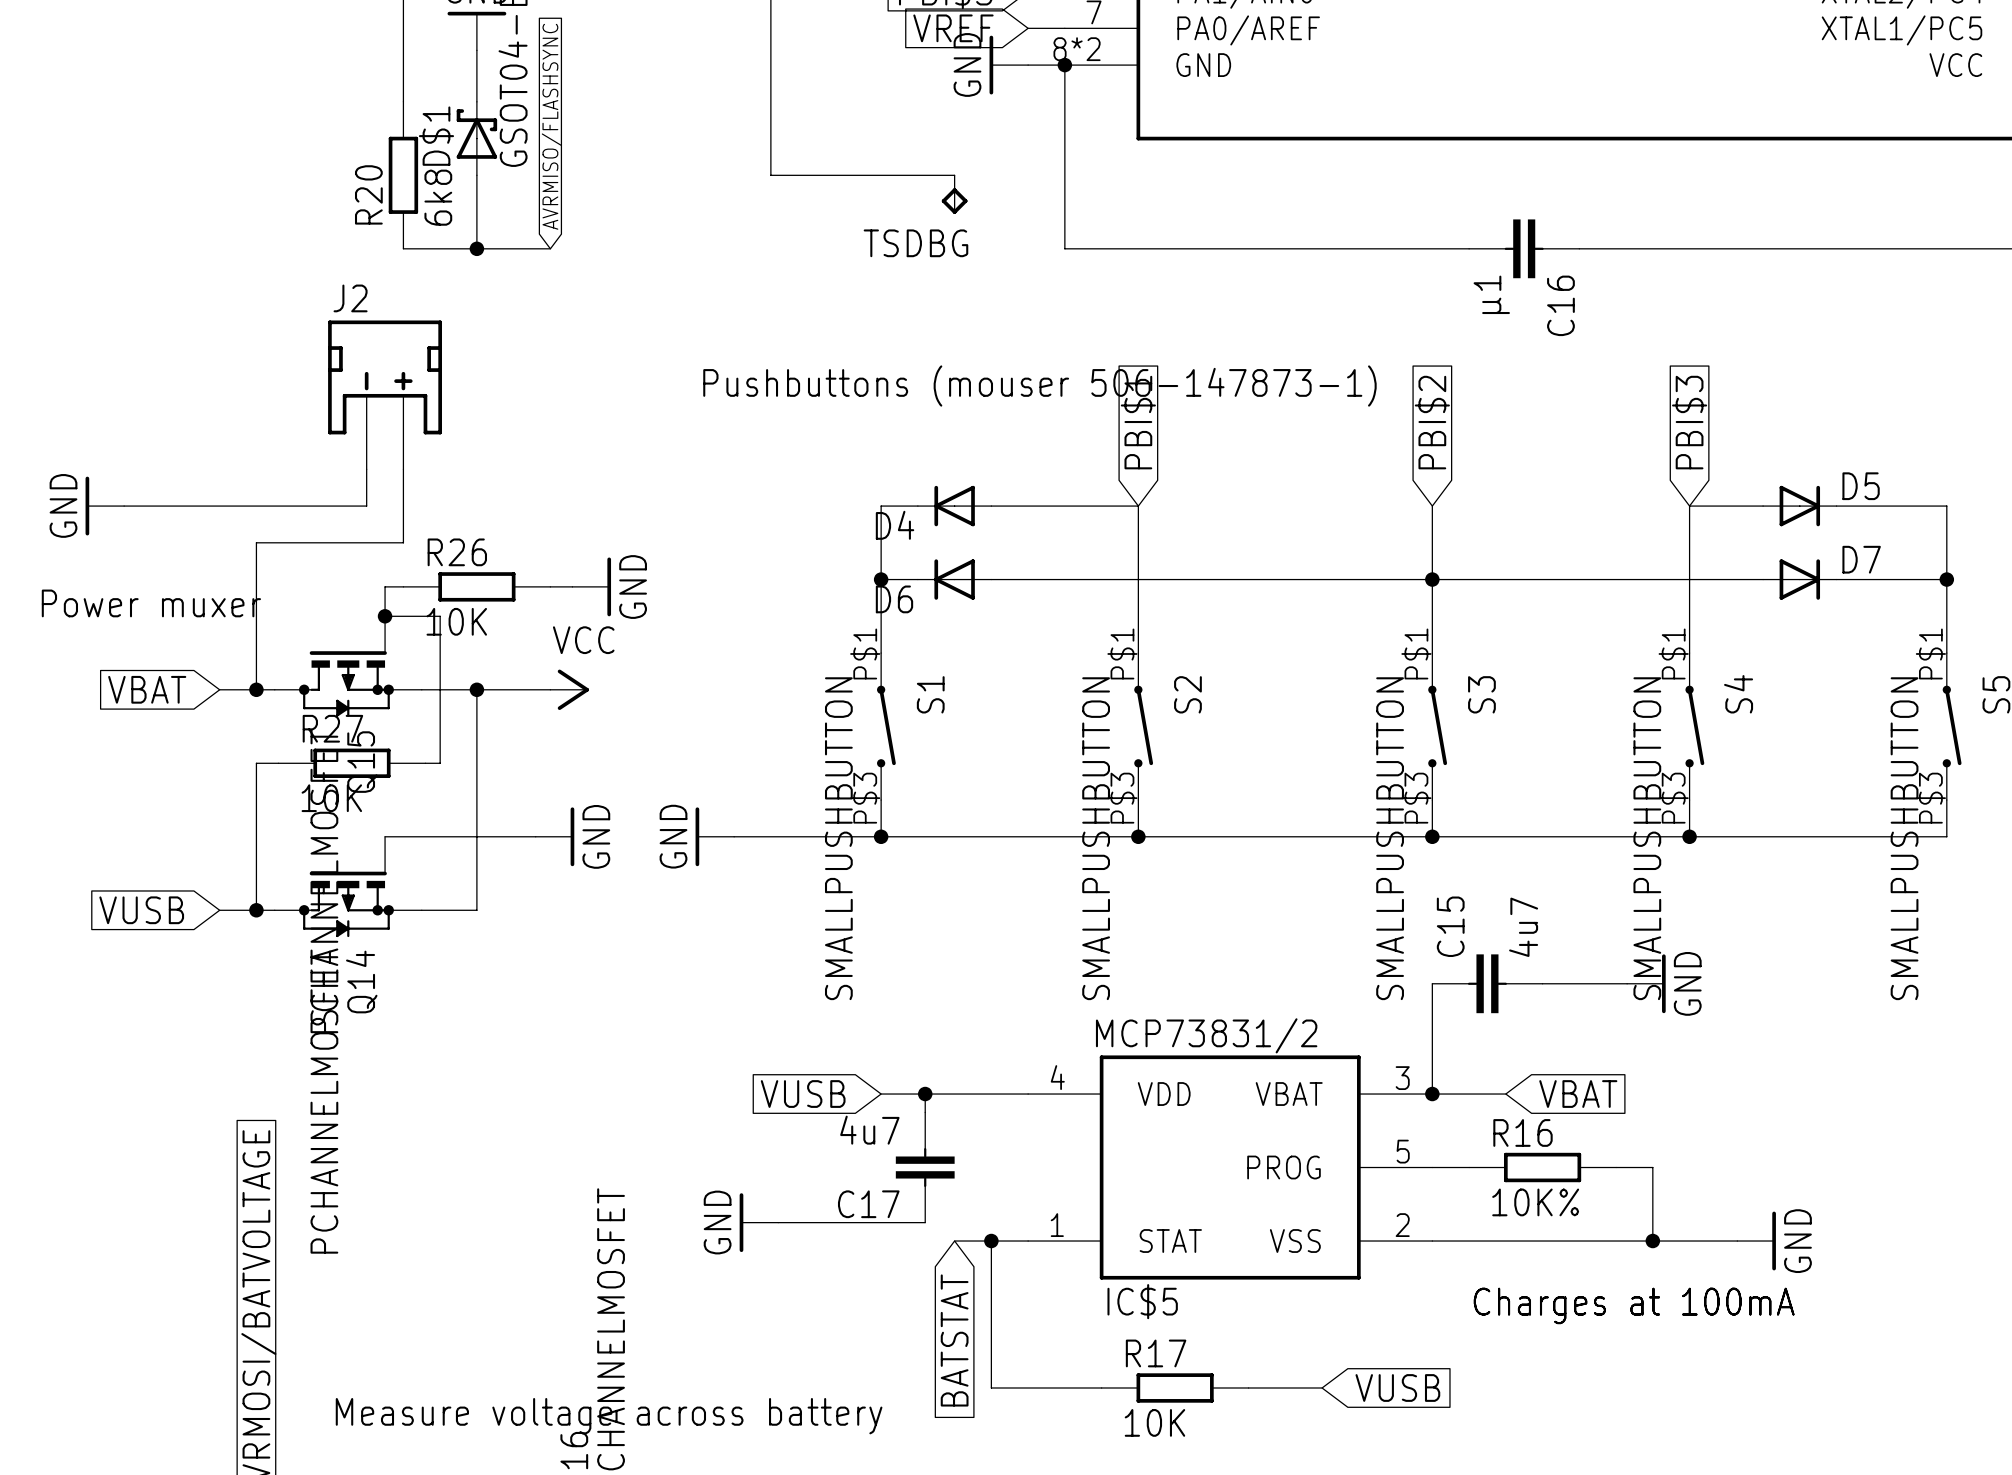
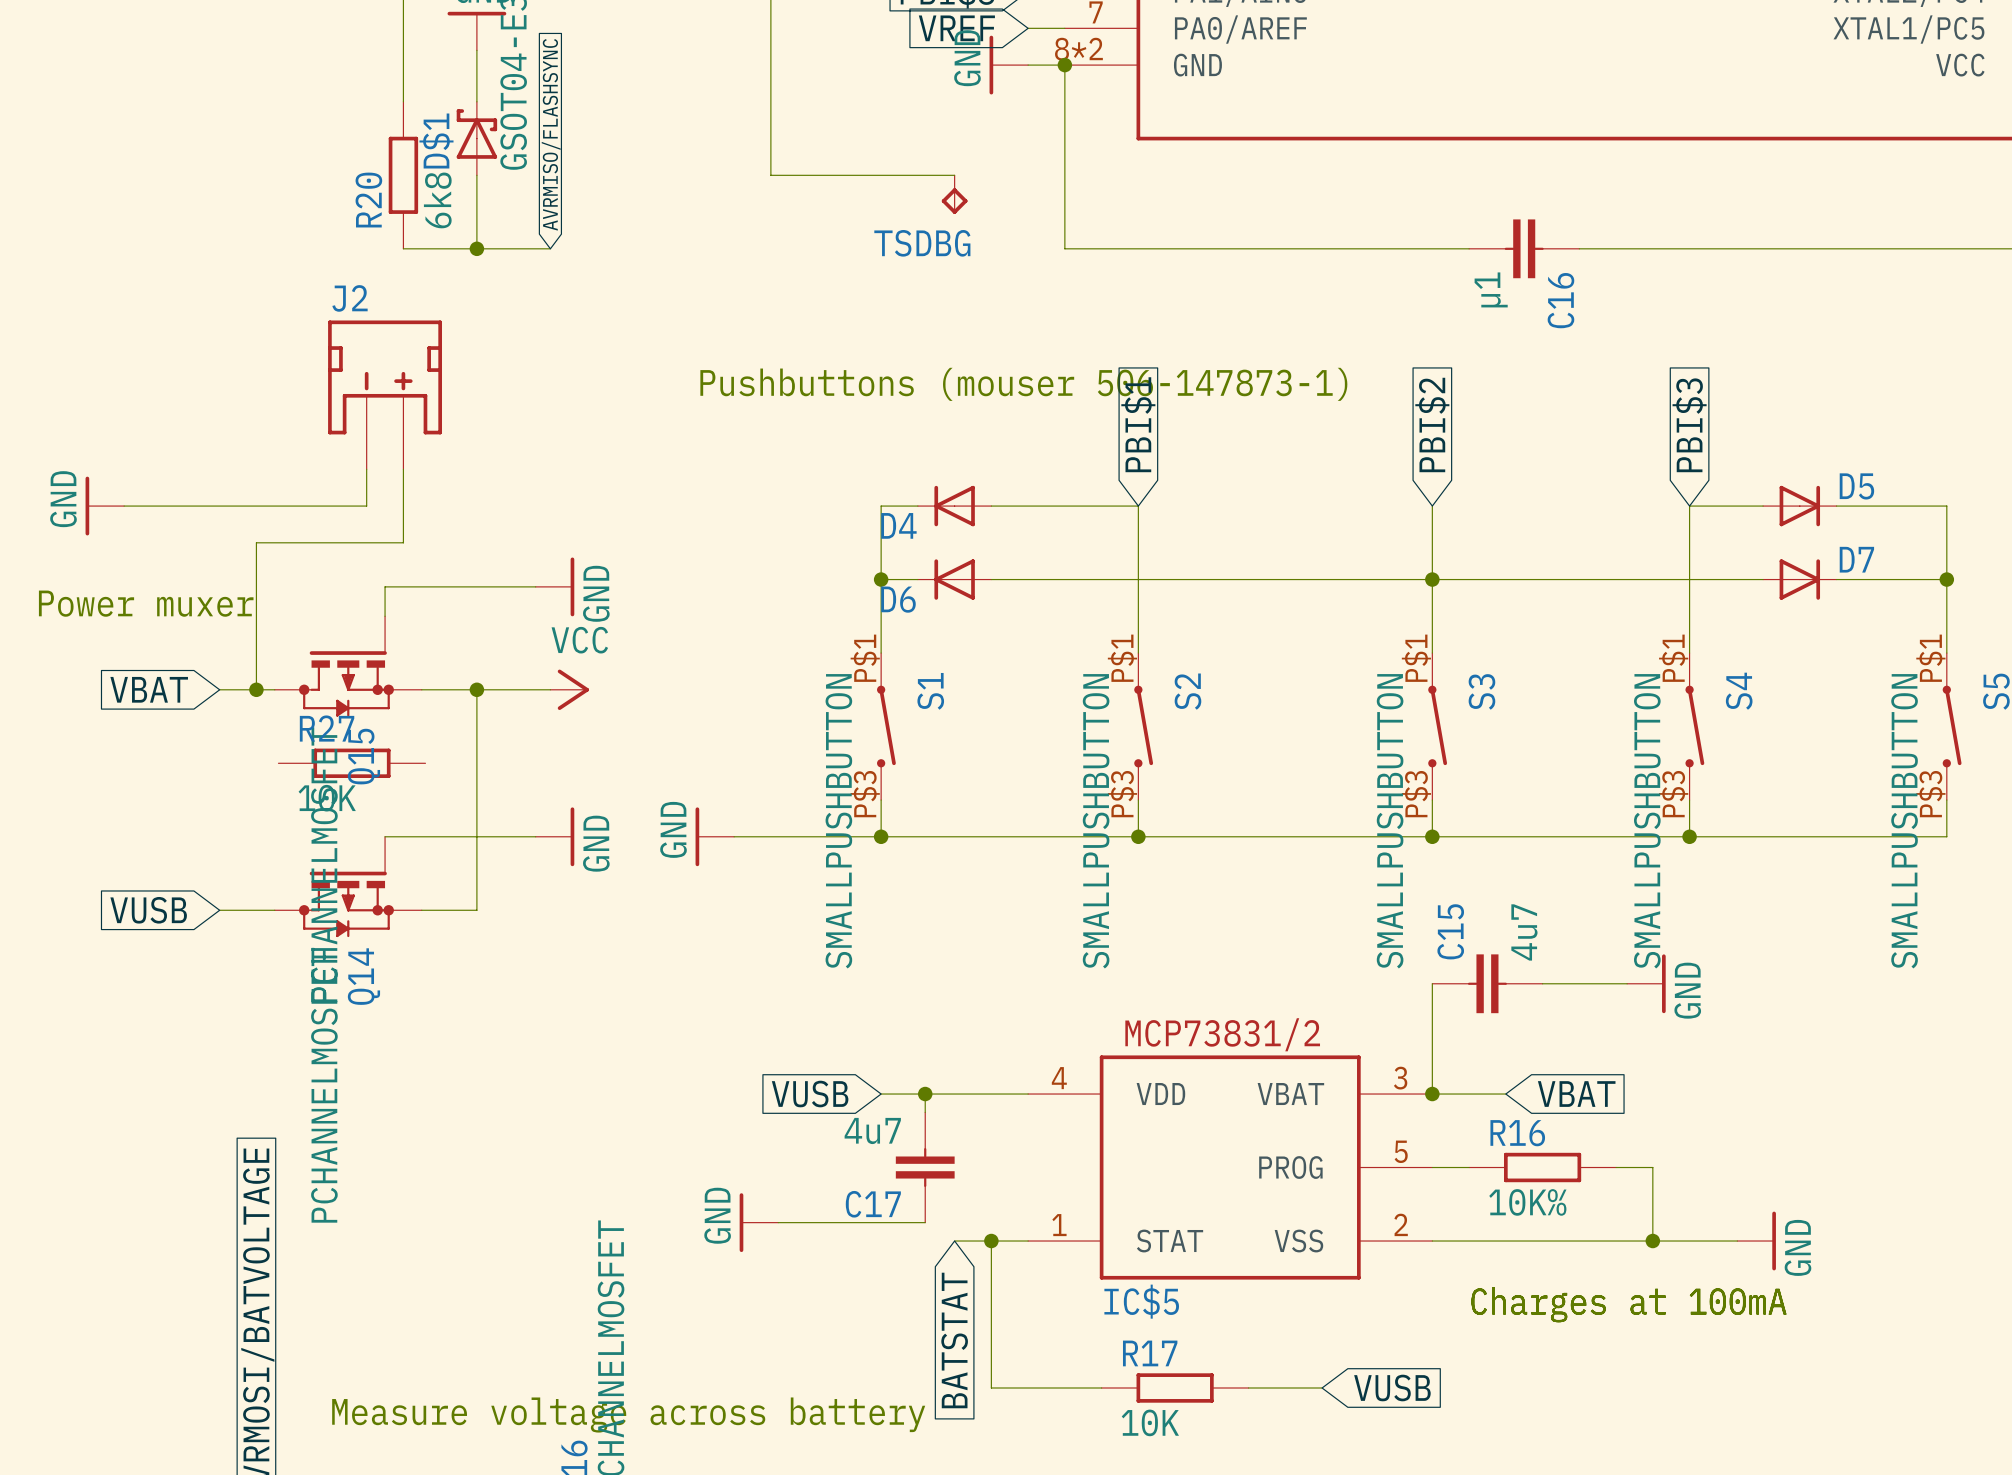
wire: none -> (403, 586) (535, 586)
R26: 10K (476, 586) -> none
power symbol position: GND (591, 586) -> GND (555, 586)
wire: (385, 616) (440, 616) (440, 763) (425, 763) -> none
junction: (385, 616) -> none
wire: (278, 763) (256, 763) (256, 910) -> none
junction: (256, 910) -> none

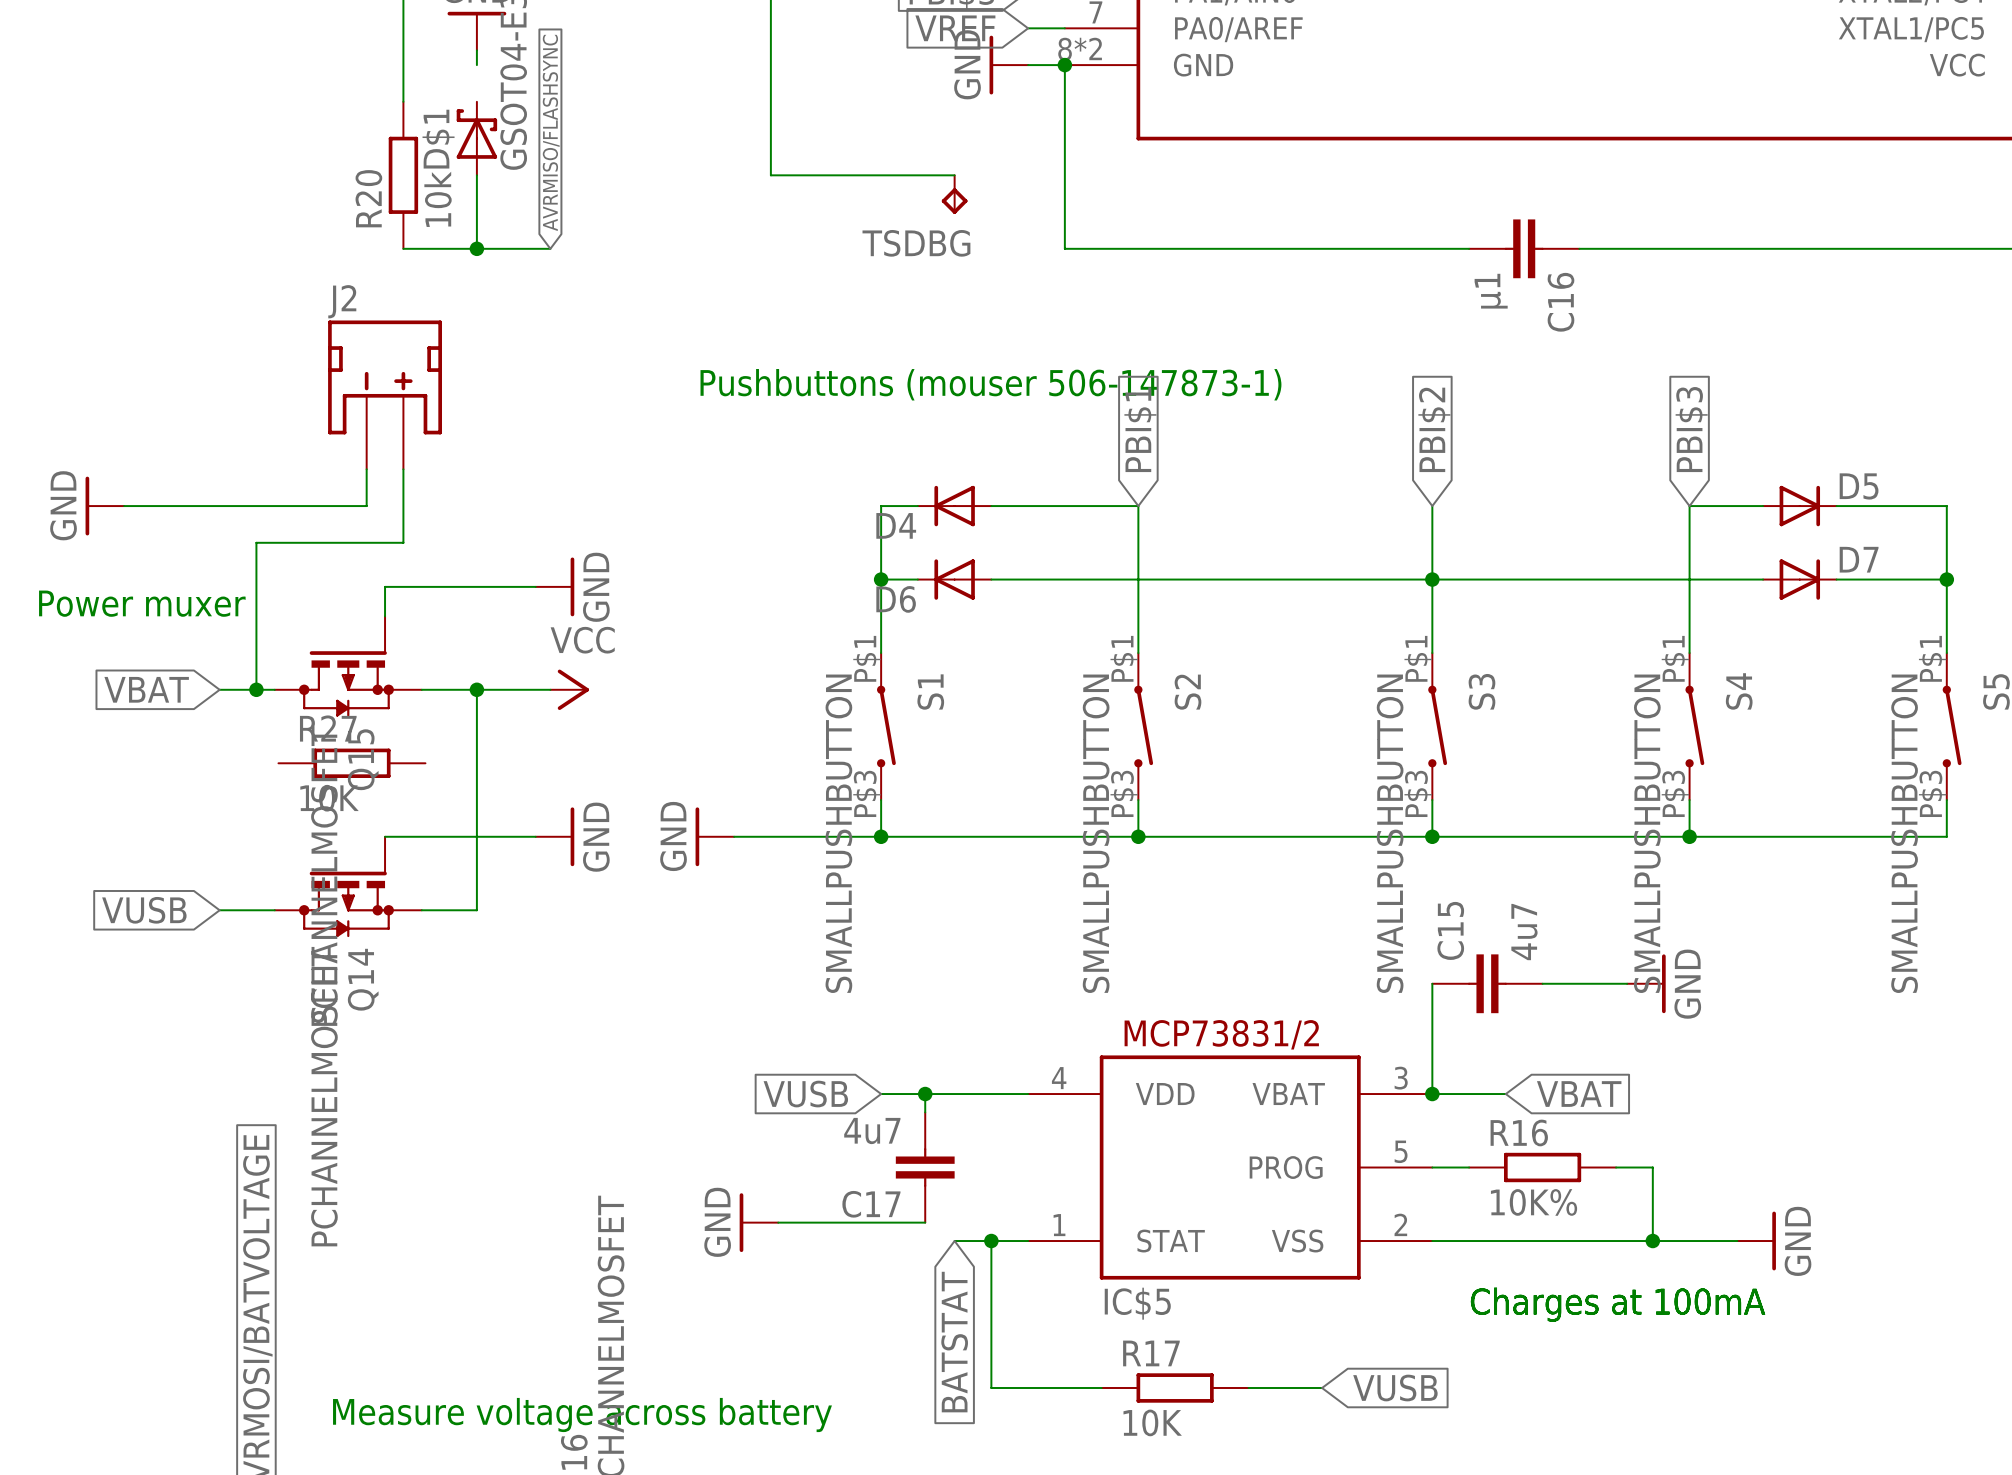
wire: (476, 65) (476, 101) -> none
R20 value: 6k8 (437, 200) -> 10k (438, 199)

